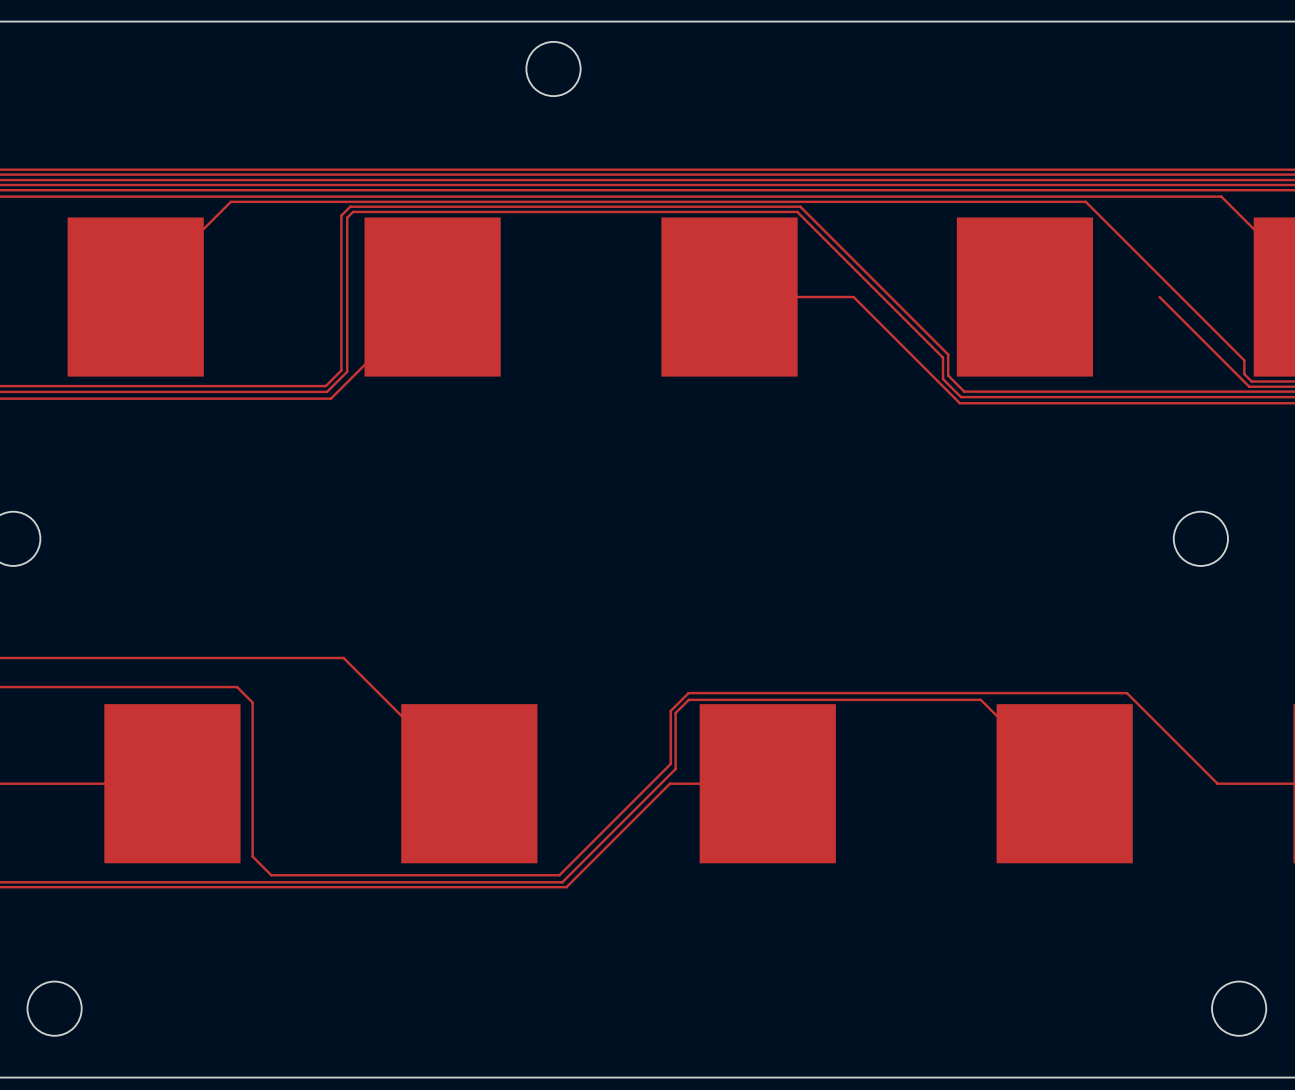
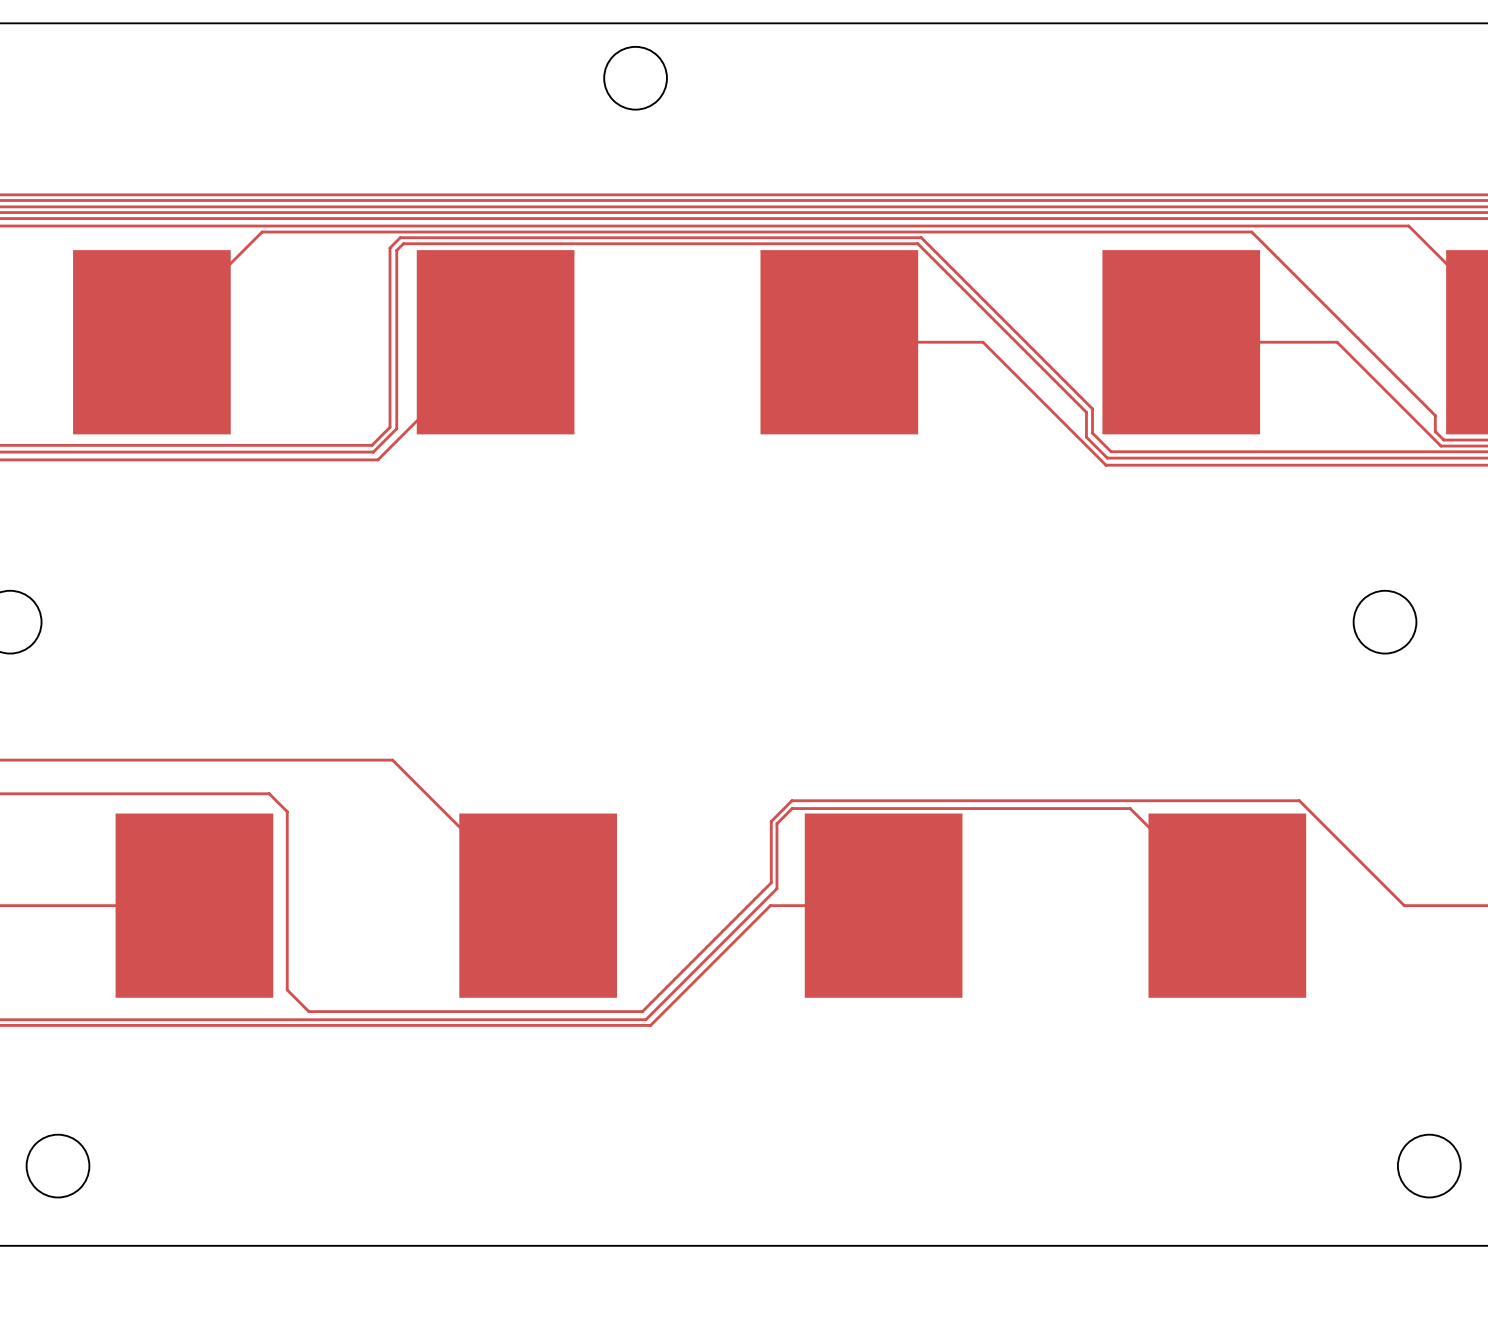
top track: none -> (1337, 342) (1181, 342)

